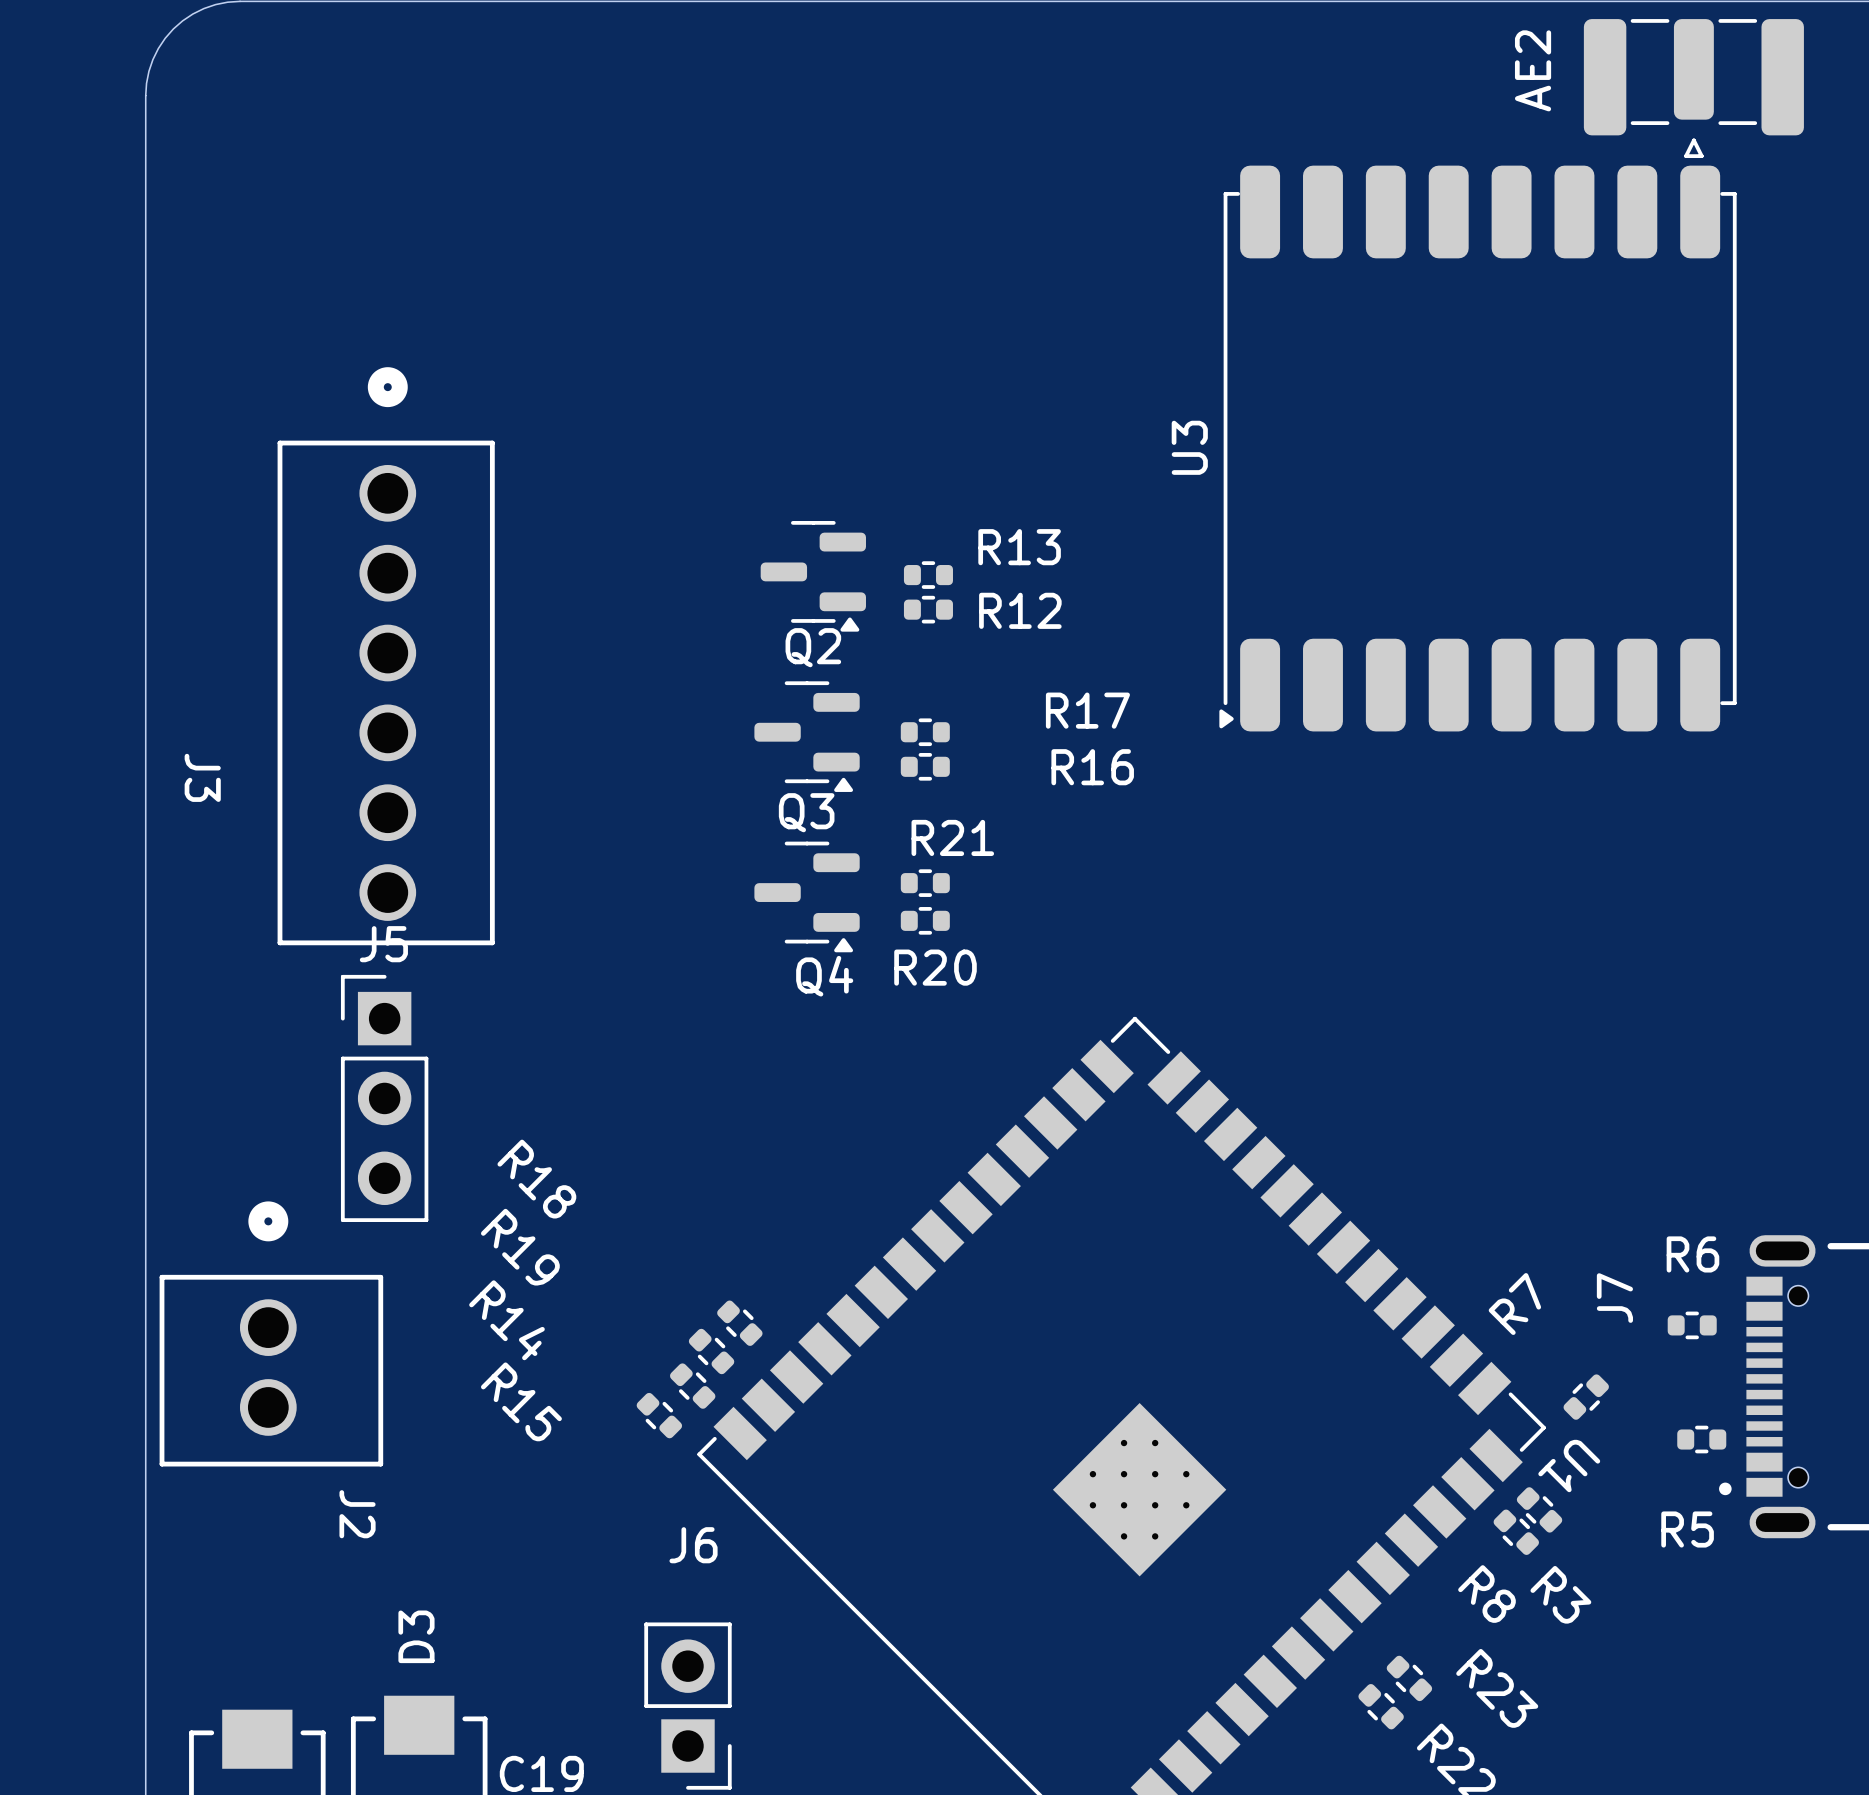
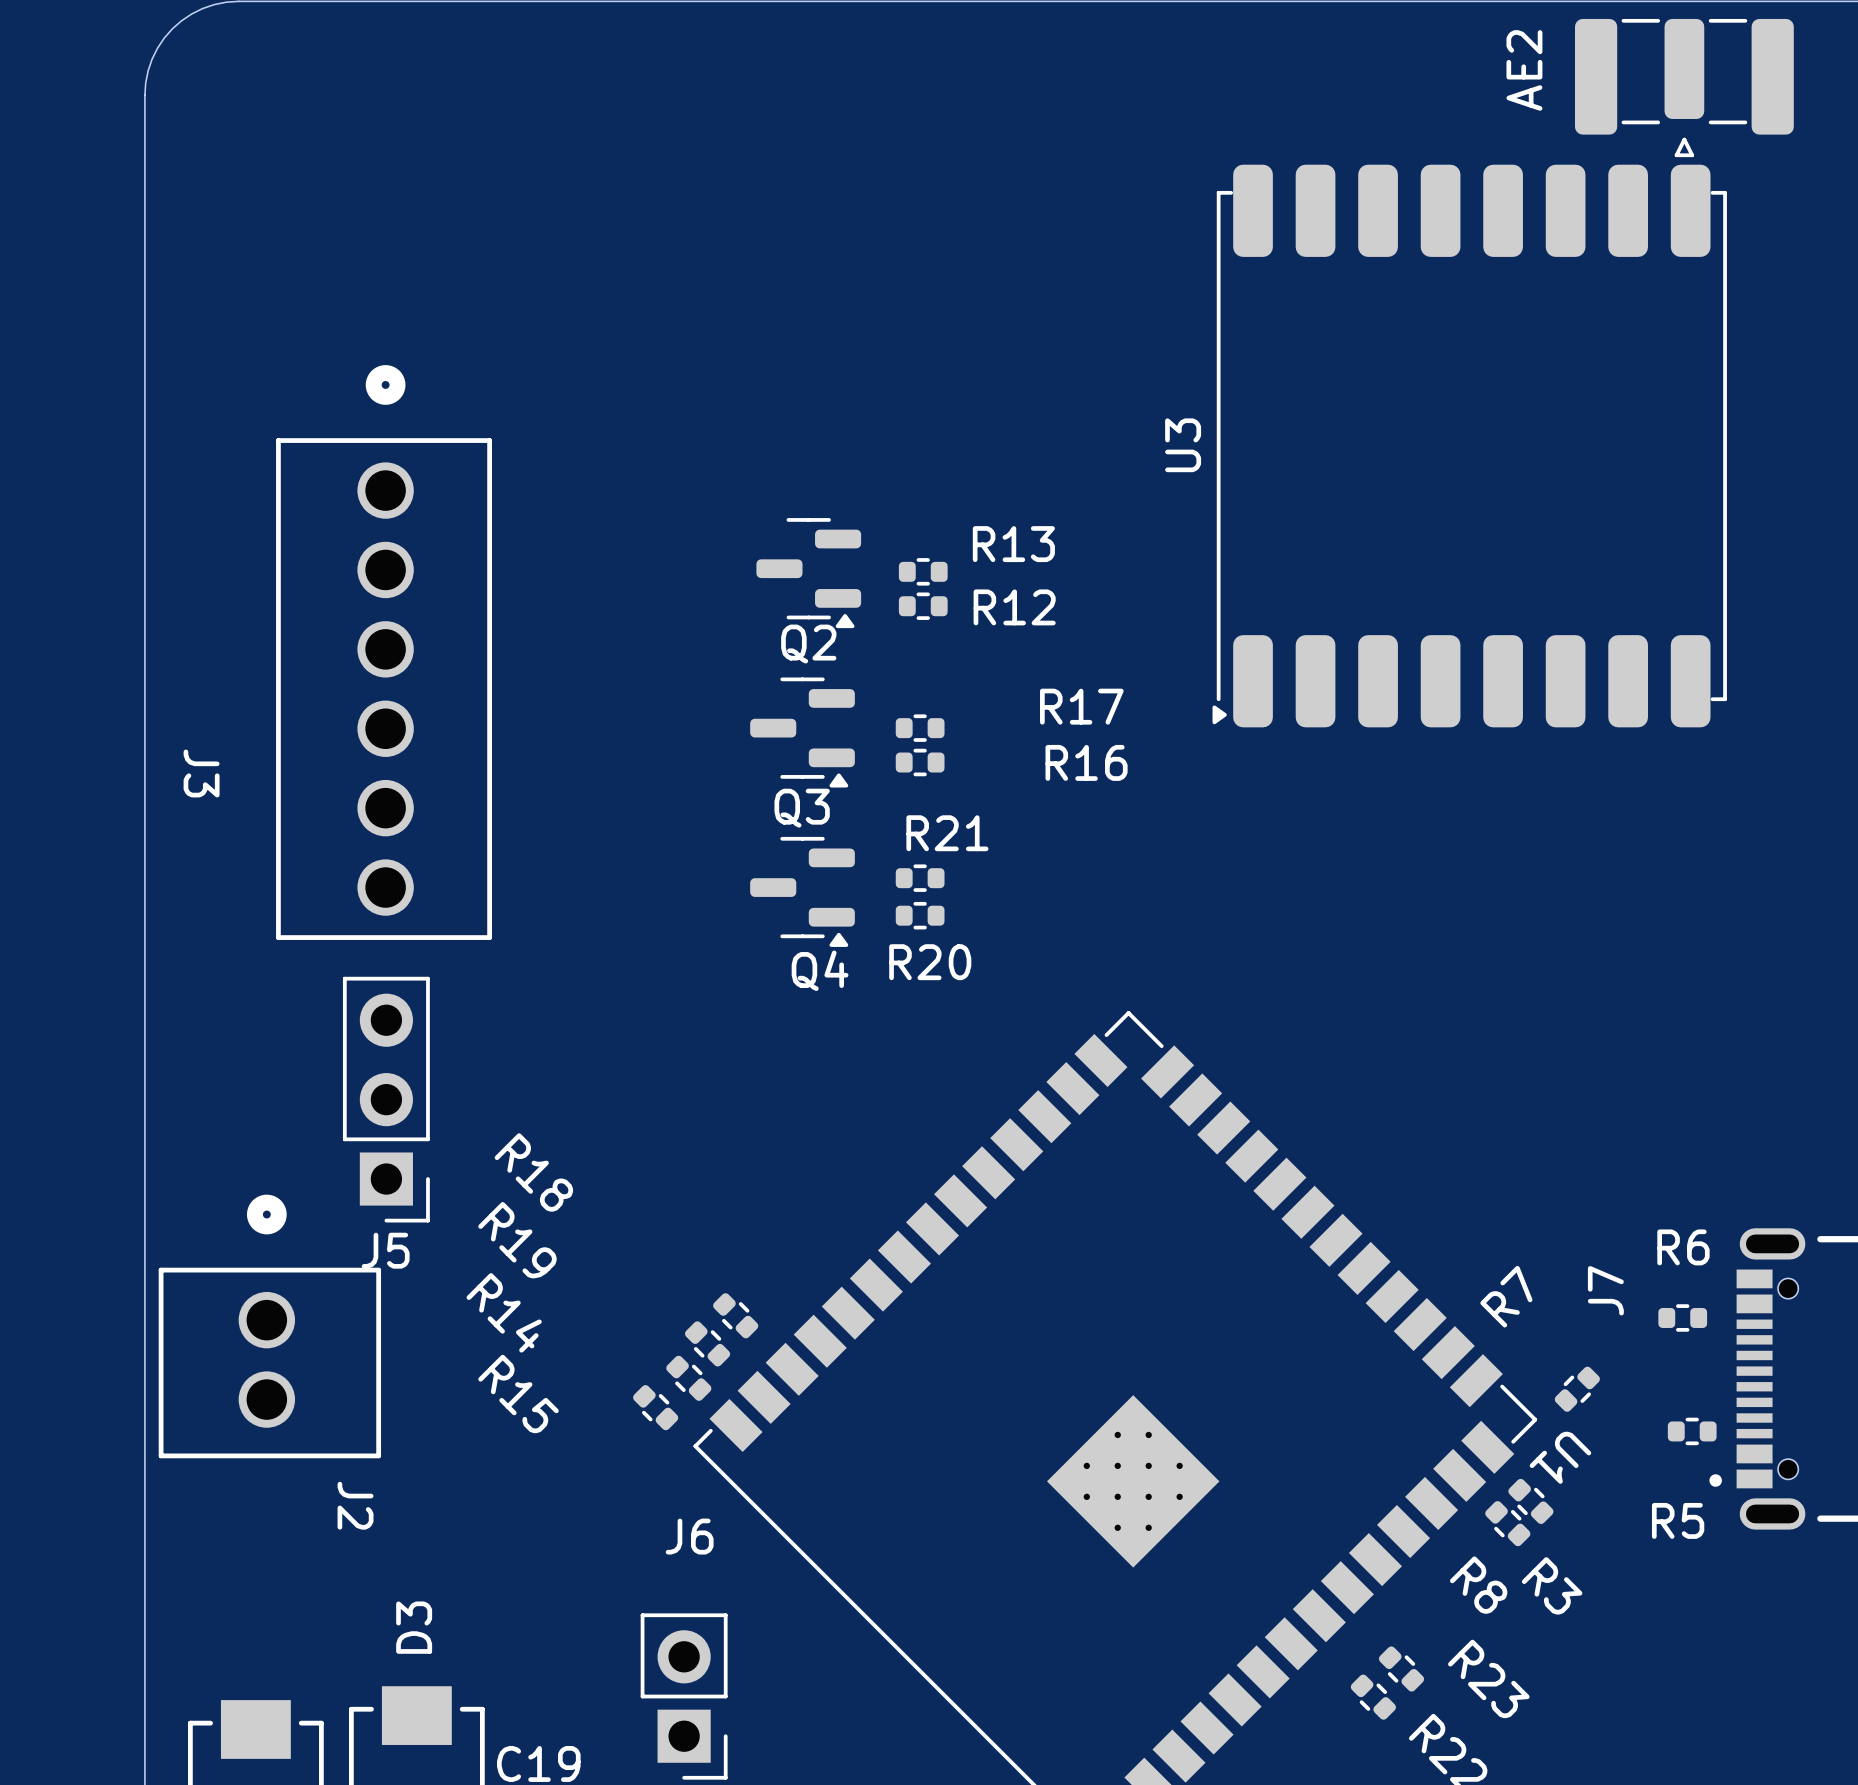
J5 rotation: 0° (384, 1098) -> 180° (386, 1099)

